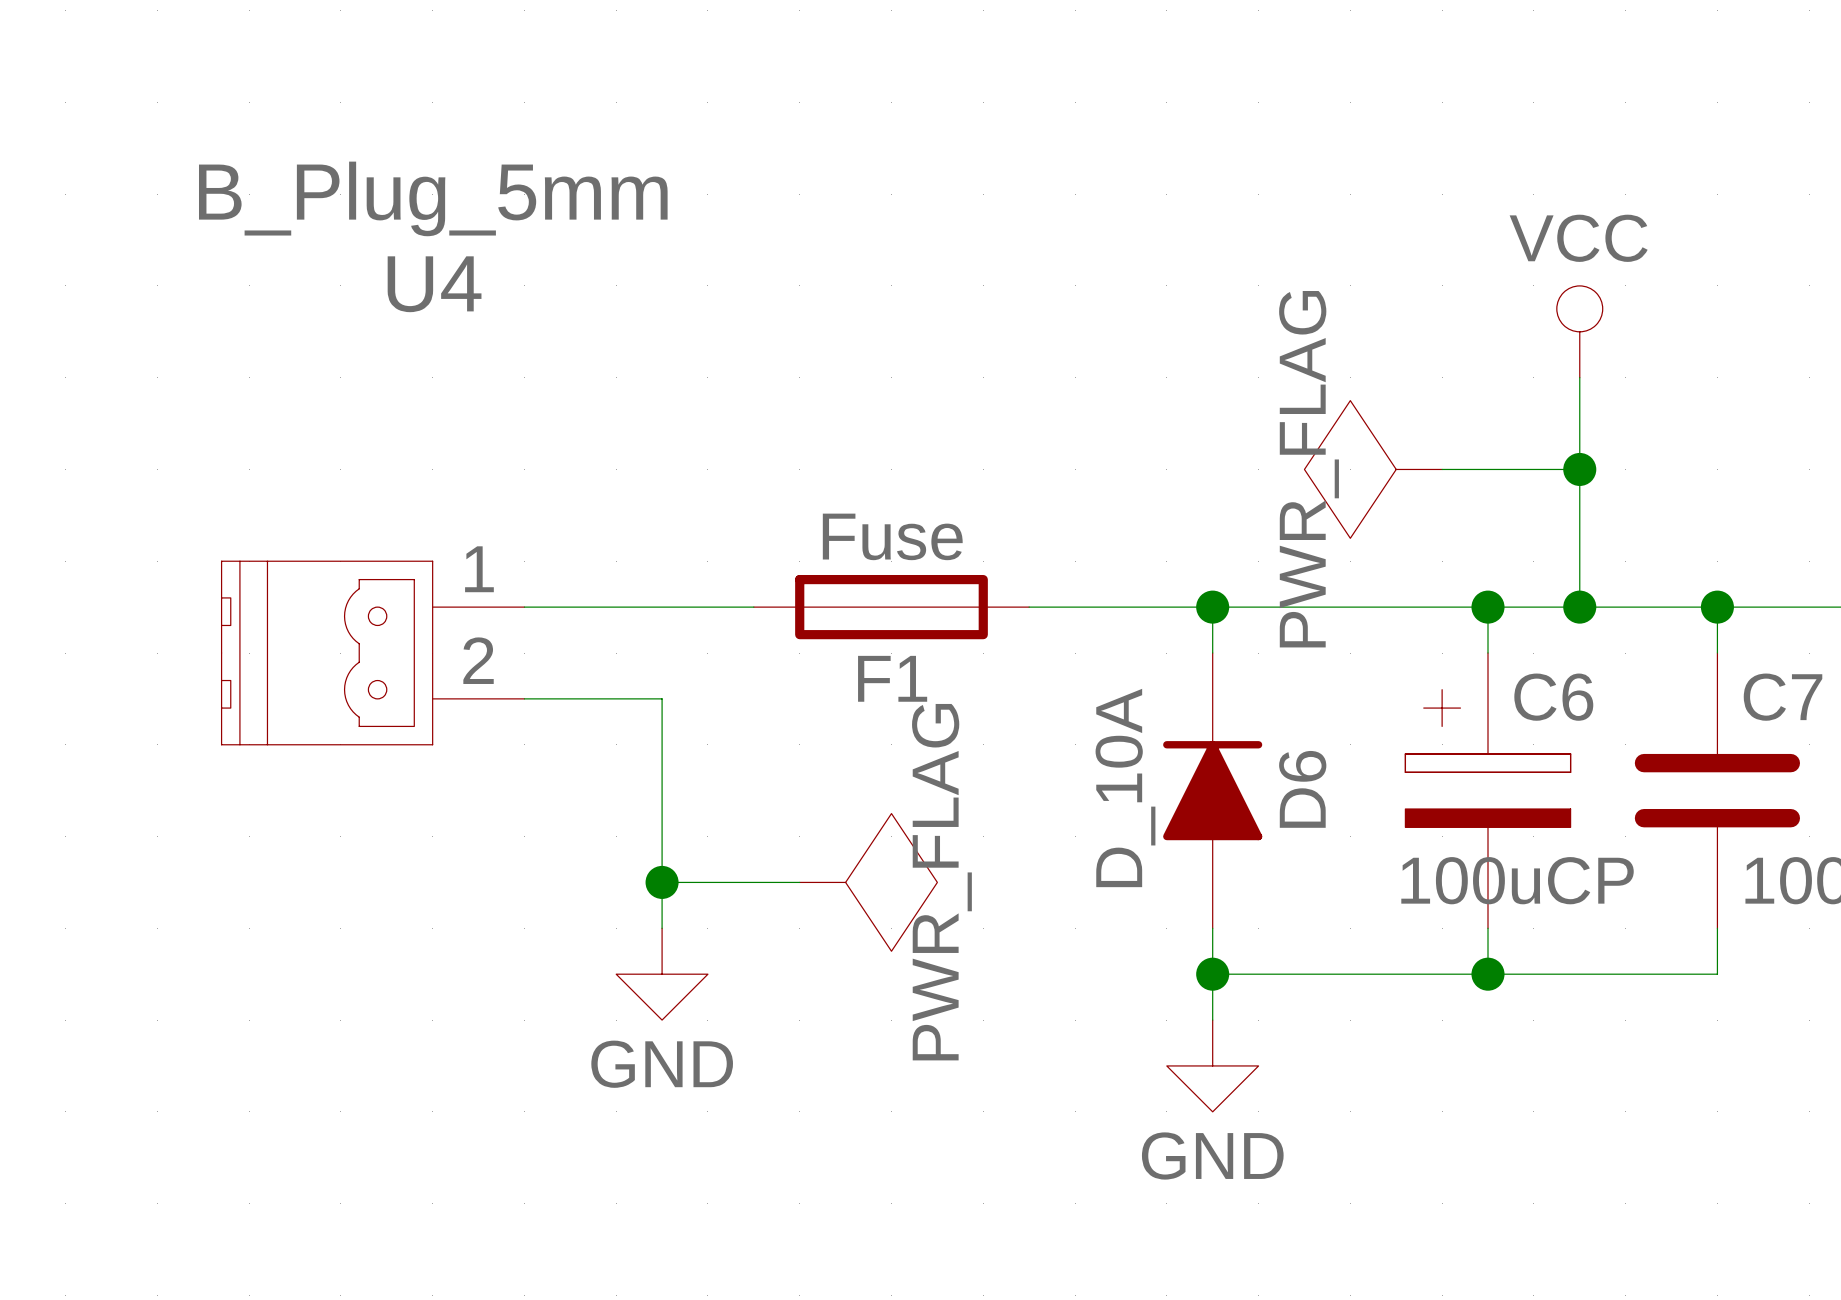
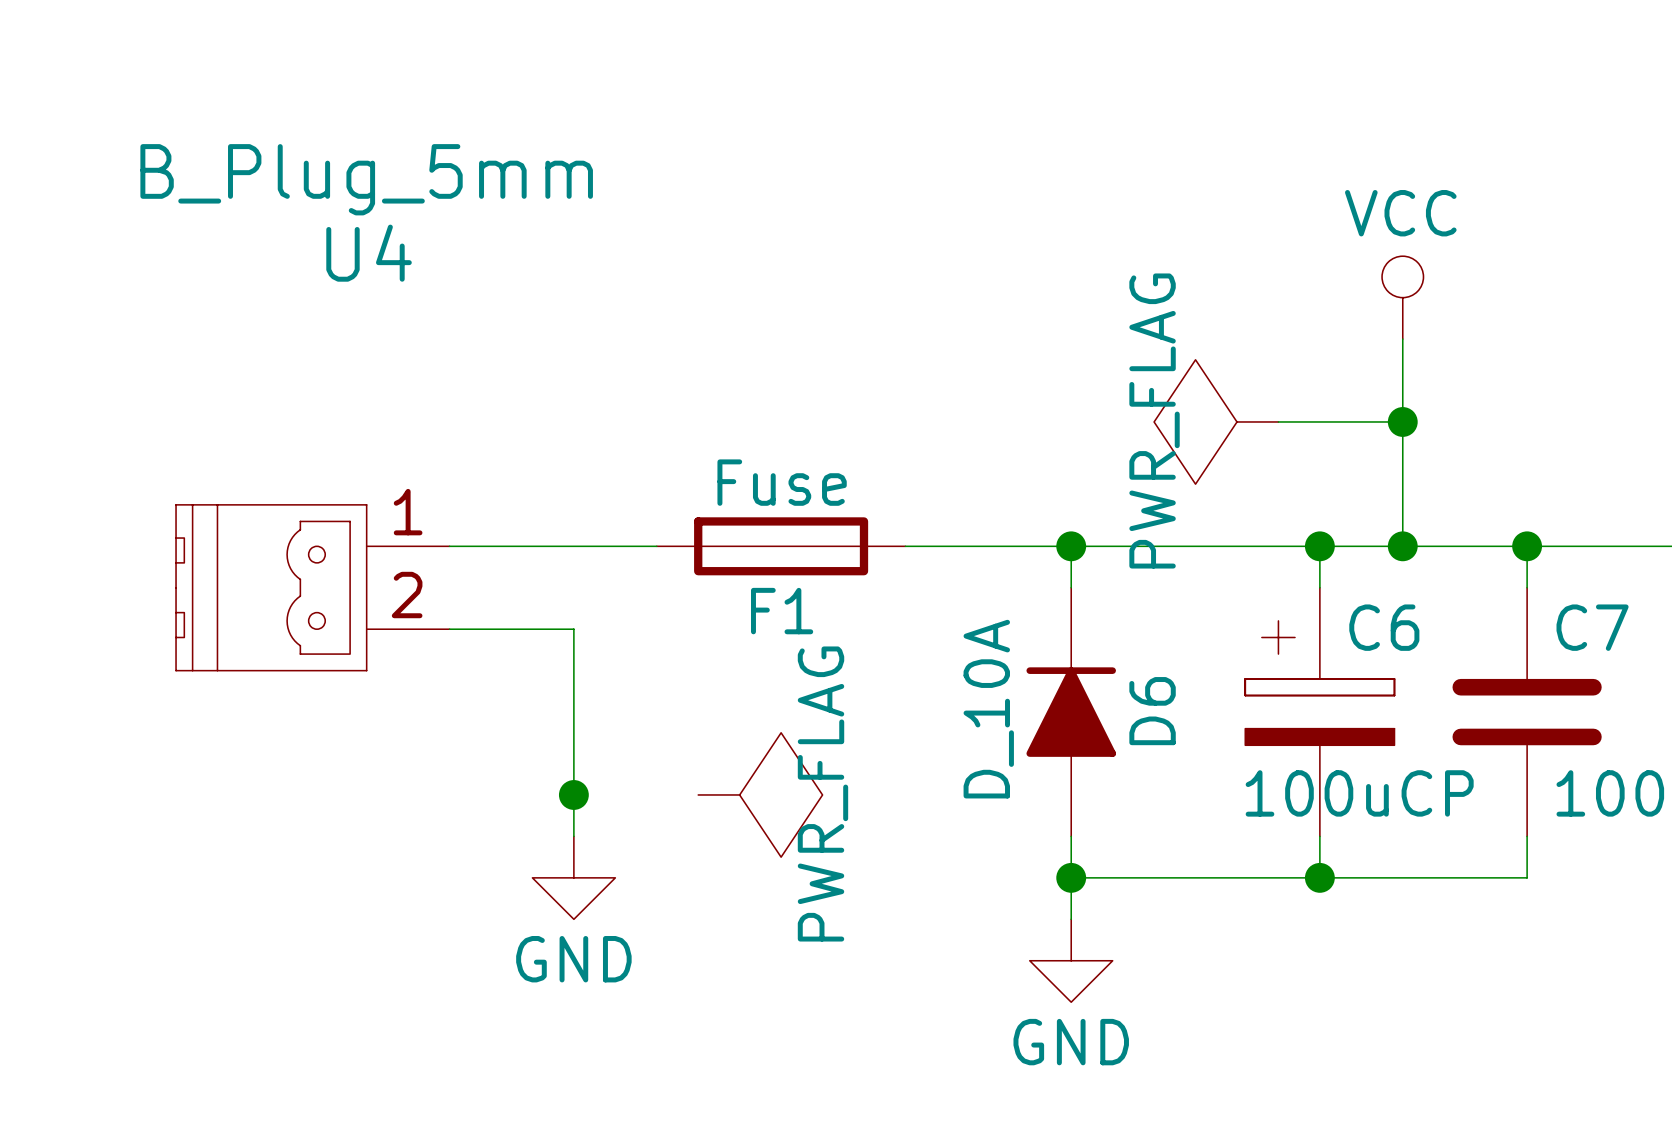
wire: (662, 882) (799, 882) -> none

